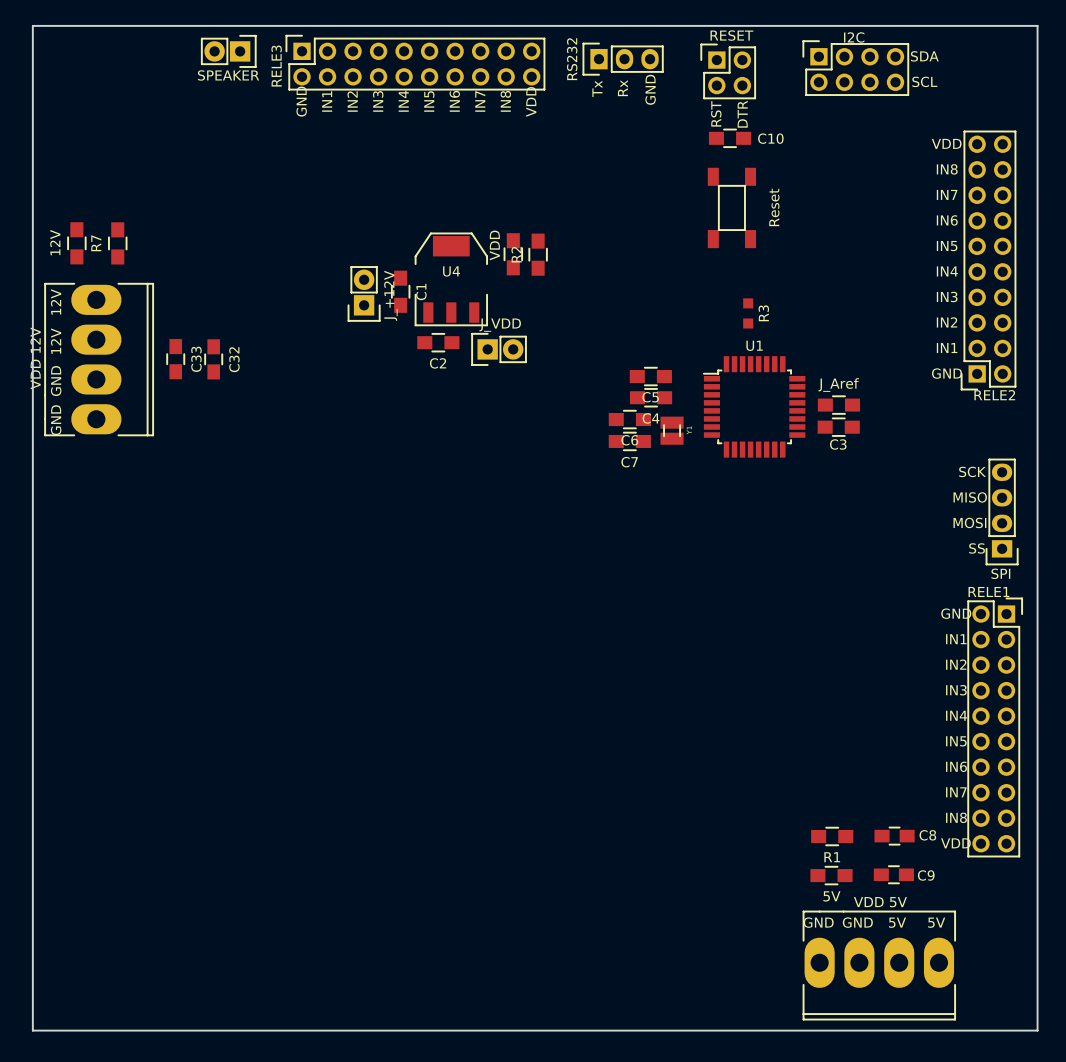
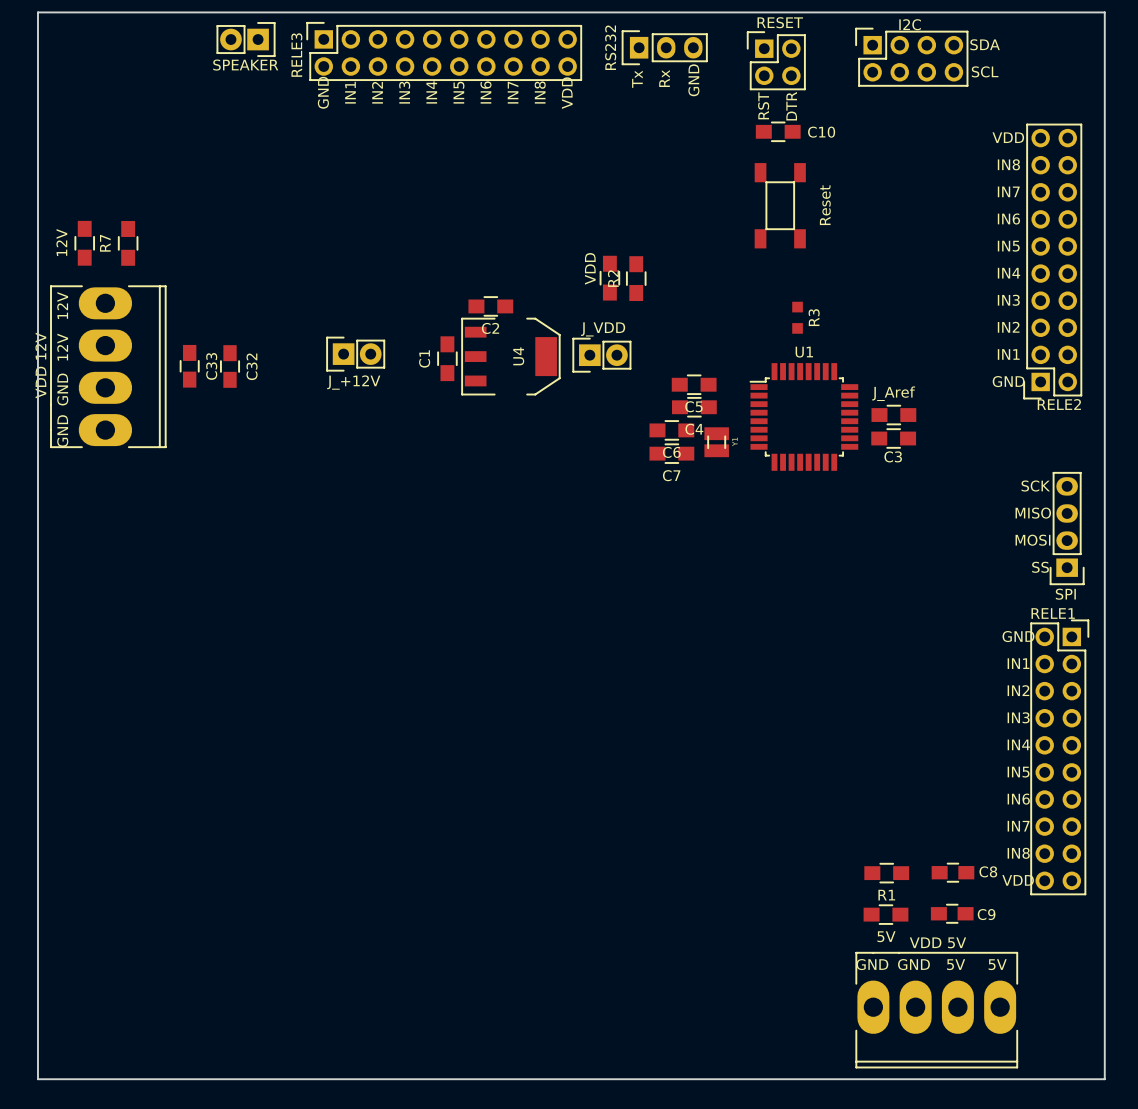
part position: (513, 254) -> (609, 278)
R2 position: (538, 254) -> (636, 278)
U4 rotation: 0° (451, 279) -> 90° clockwise (510, 356)
U4 position: (451, 279) -> (510, 356)
C1 position: (400, 291) -> (447, 358)
C1 name position: C1 (421, 291) -> C1 (424, 358)
part rotation: 0° (364, 293) -> 90° clockwise (355, 354)
part position: (364, 293) -> (355, 354)
C2 position: (438, 342) -> (490, 306)
part position: (499, 349) -> (601, 355)

